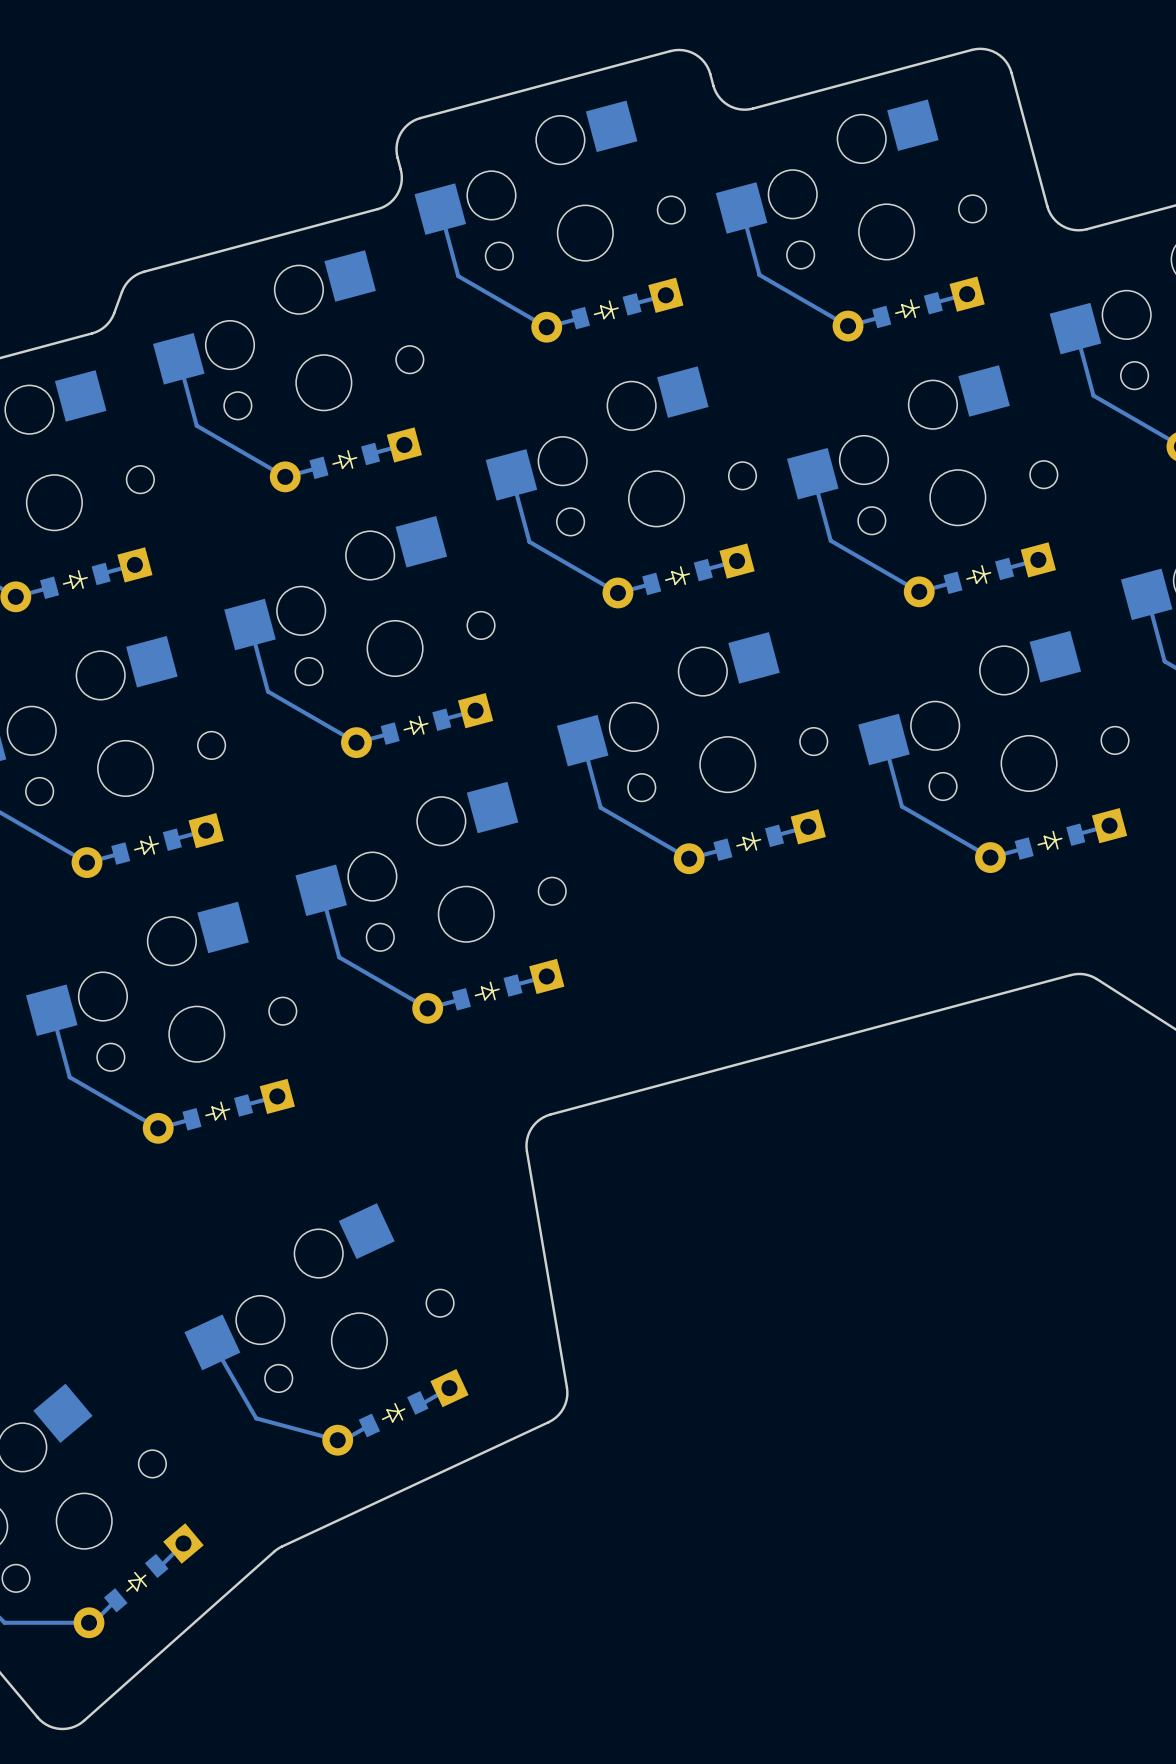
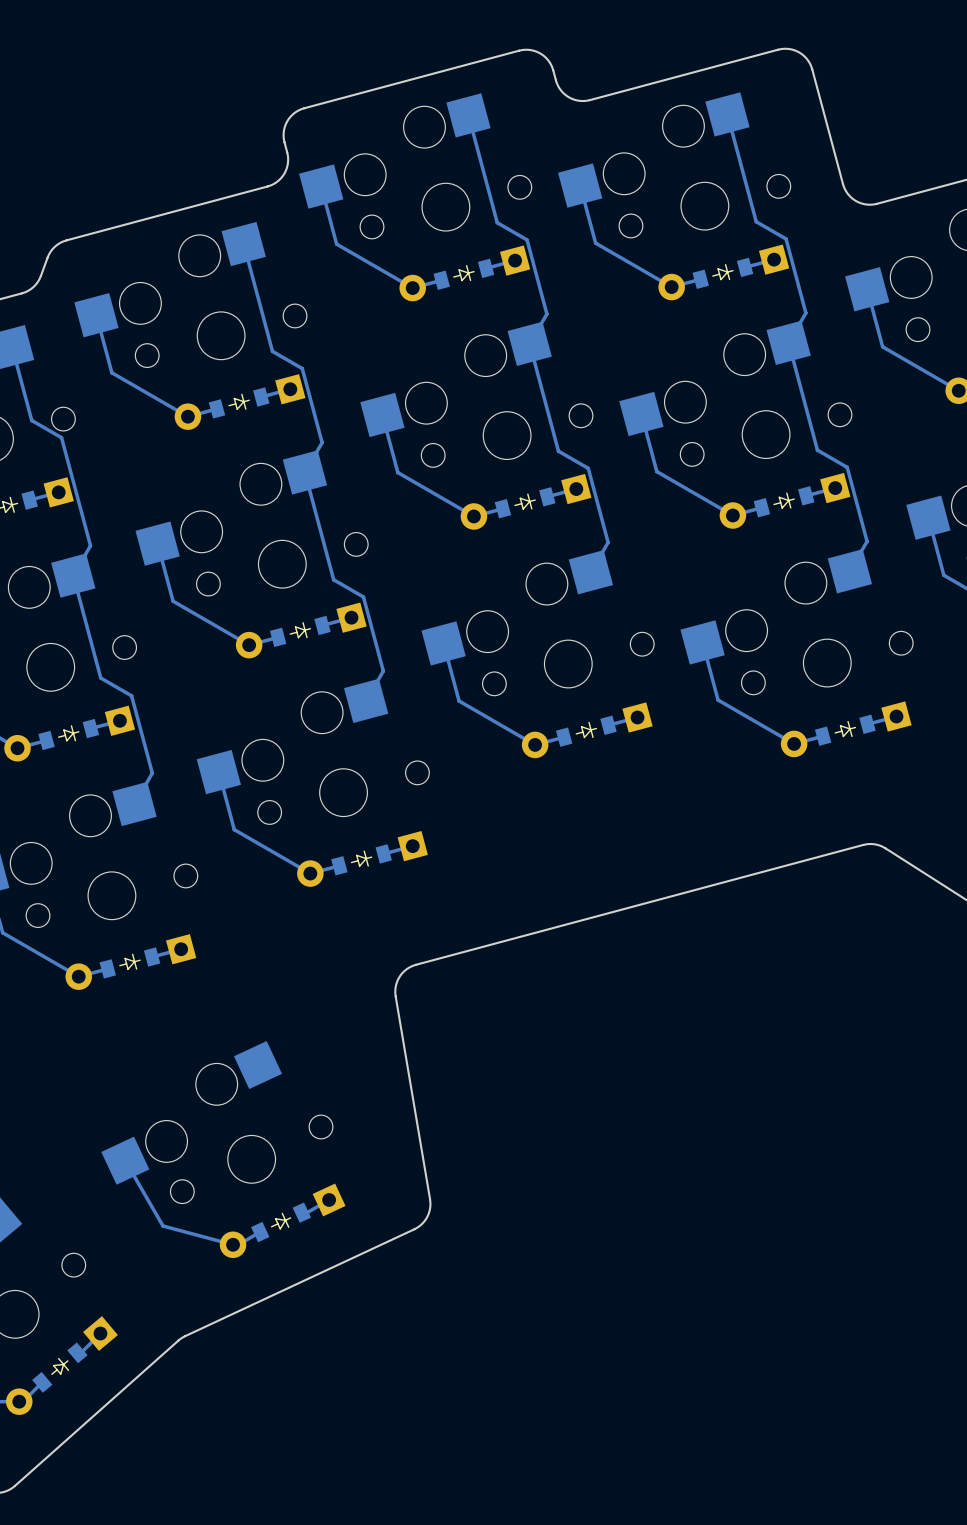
track: none -> (727, 114) (756, 221) (786, 238) (805, 313) (788, 342) (817, 450) (847, 467) (867, 541) (849, 571)
track: none -> (468, 115) (497, 222) (527, 239) (546, 314) (529, 343) (558, 451) (588, 468) (608, 542) (590, 572)
track: none -> (243, 244) (272, 351) (302, 368) (322, 442) (304, 472) (333, 579) (363, 597) (383, 671) (366, 700)
track: none -> (12, 347) (31, 420) (61, 437) (90, 545) (73, 575) (100, 678) (131, 695) (152, 773) (134, 804)

